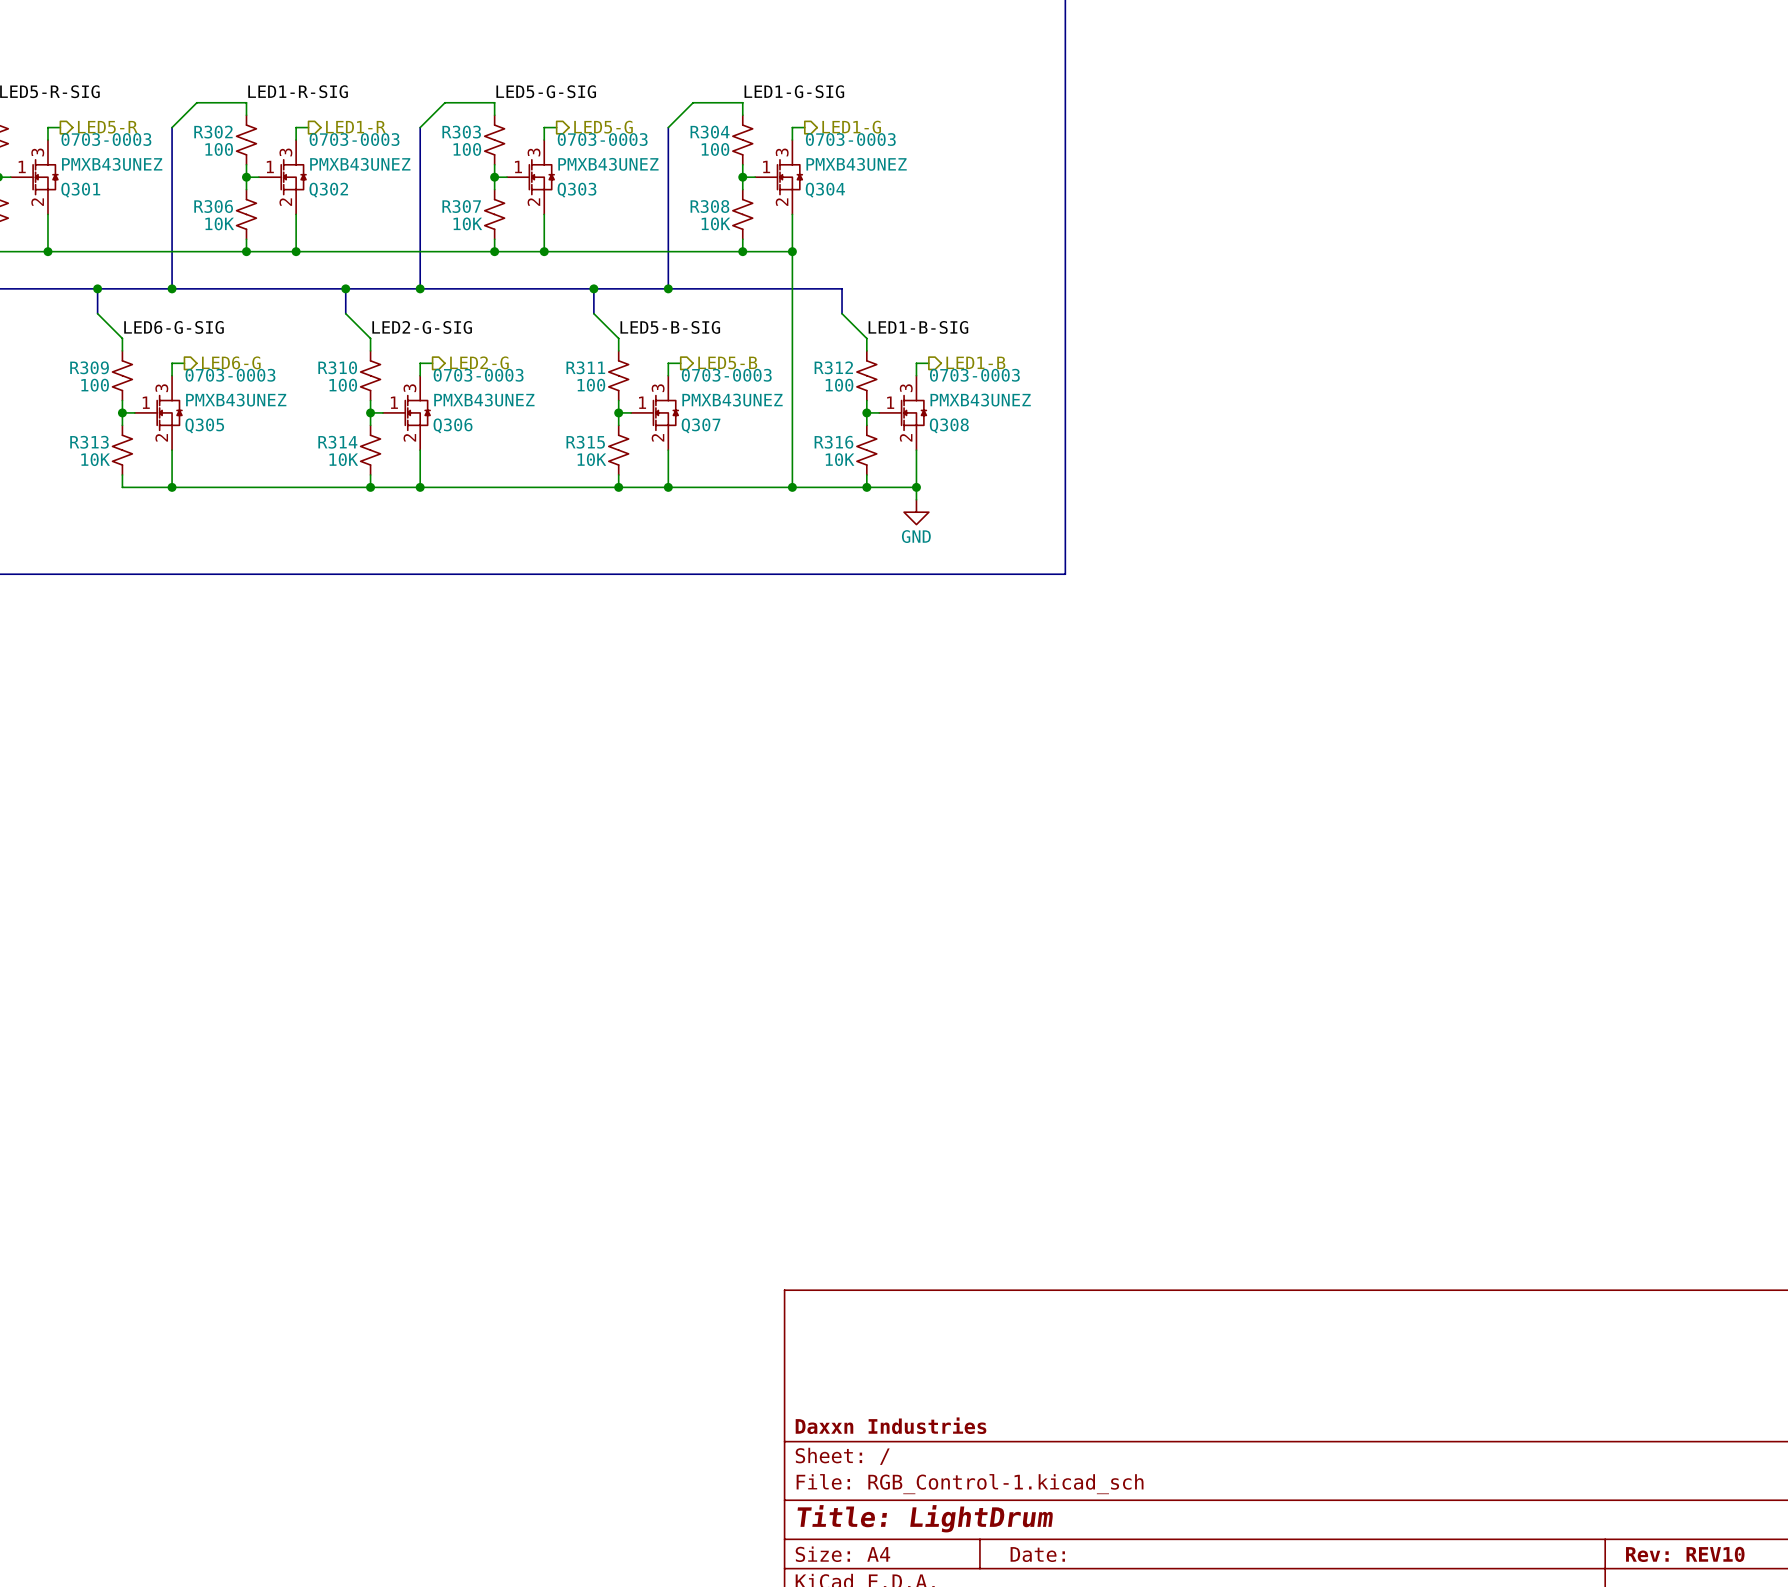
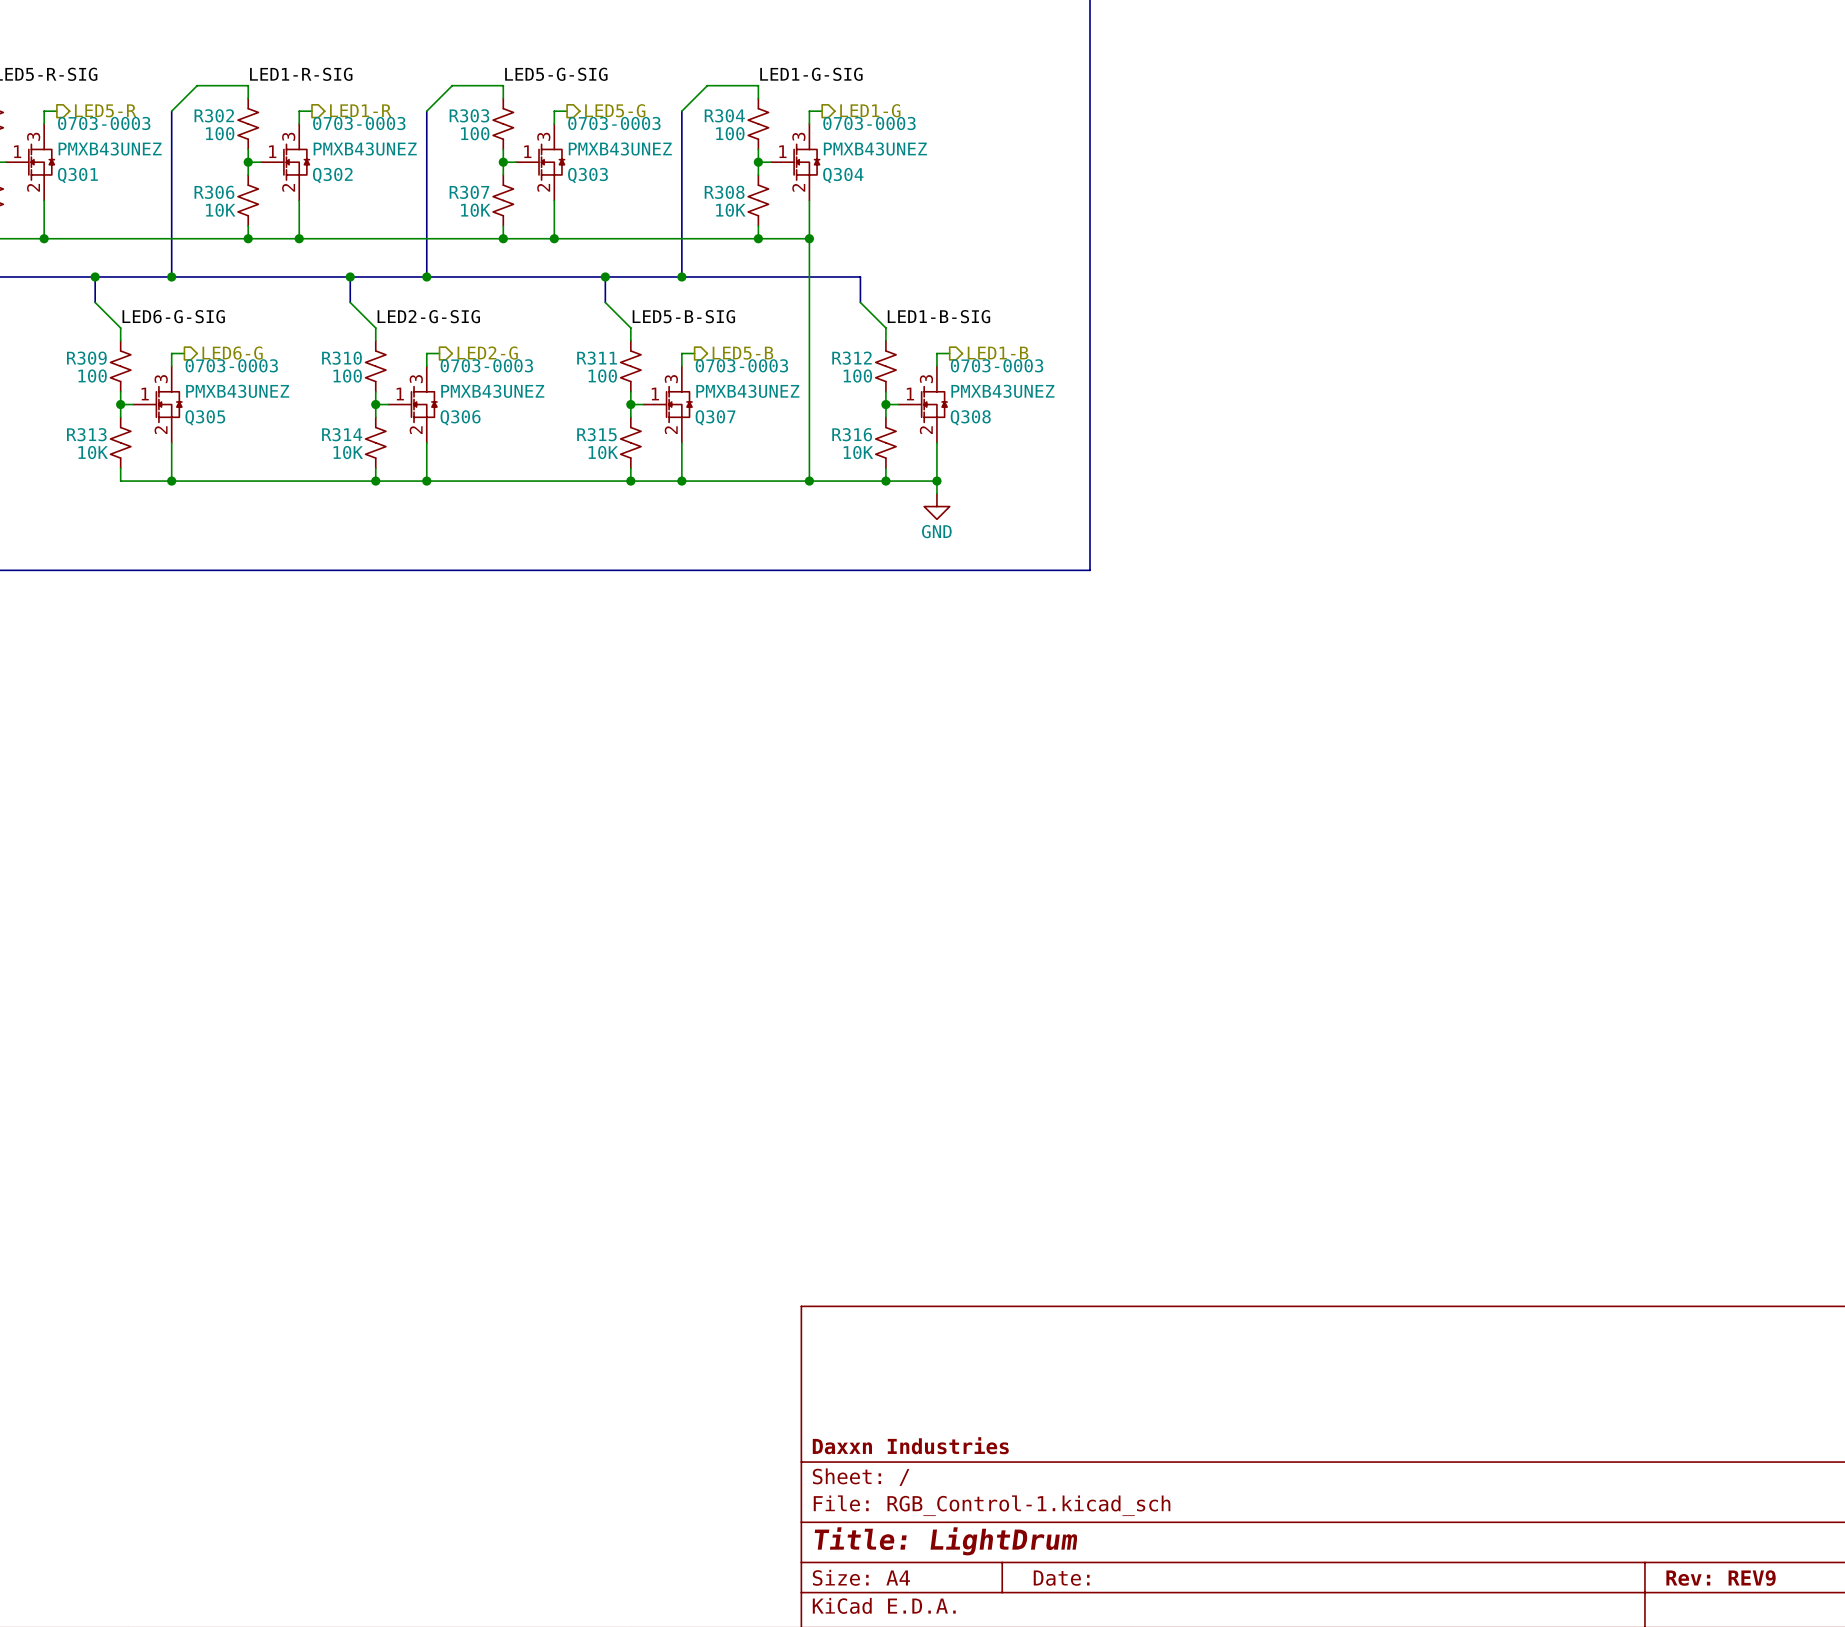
title block: Rev: REV10 (1685, 1554) -> Rev: REV9 (1721, 1578)

